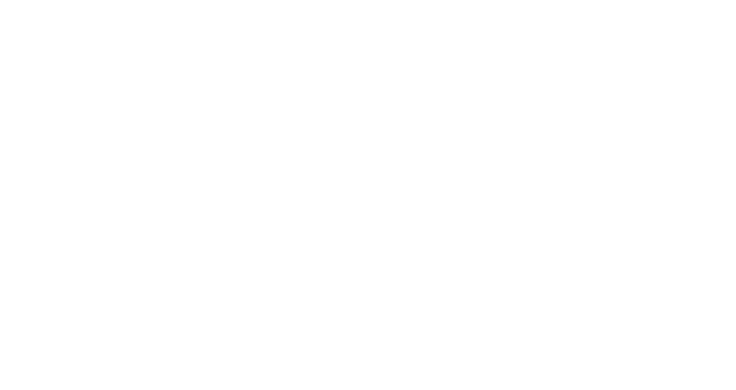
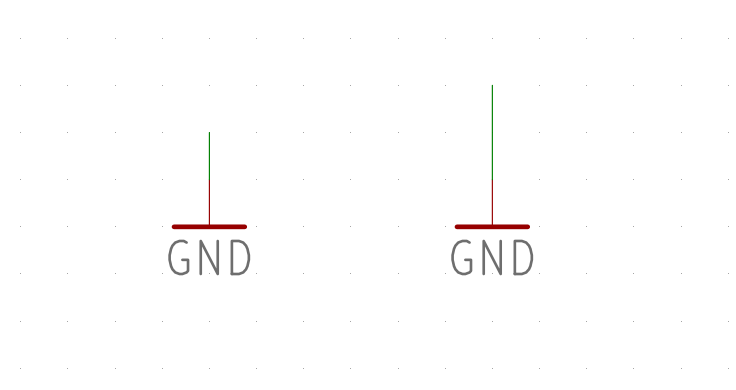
wire: none -> (492, 85) (492, 179)
wire: none -> (209, 132) (209, 179)
power symbol: none -> GND (209, 204)
power symbol: none -> GND (492, 204)

